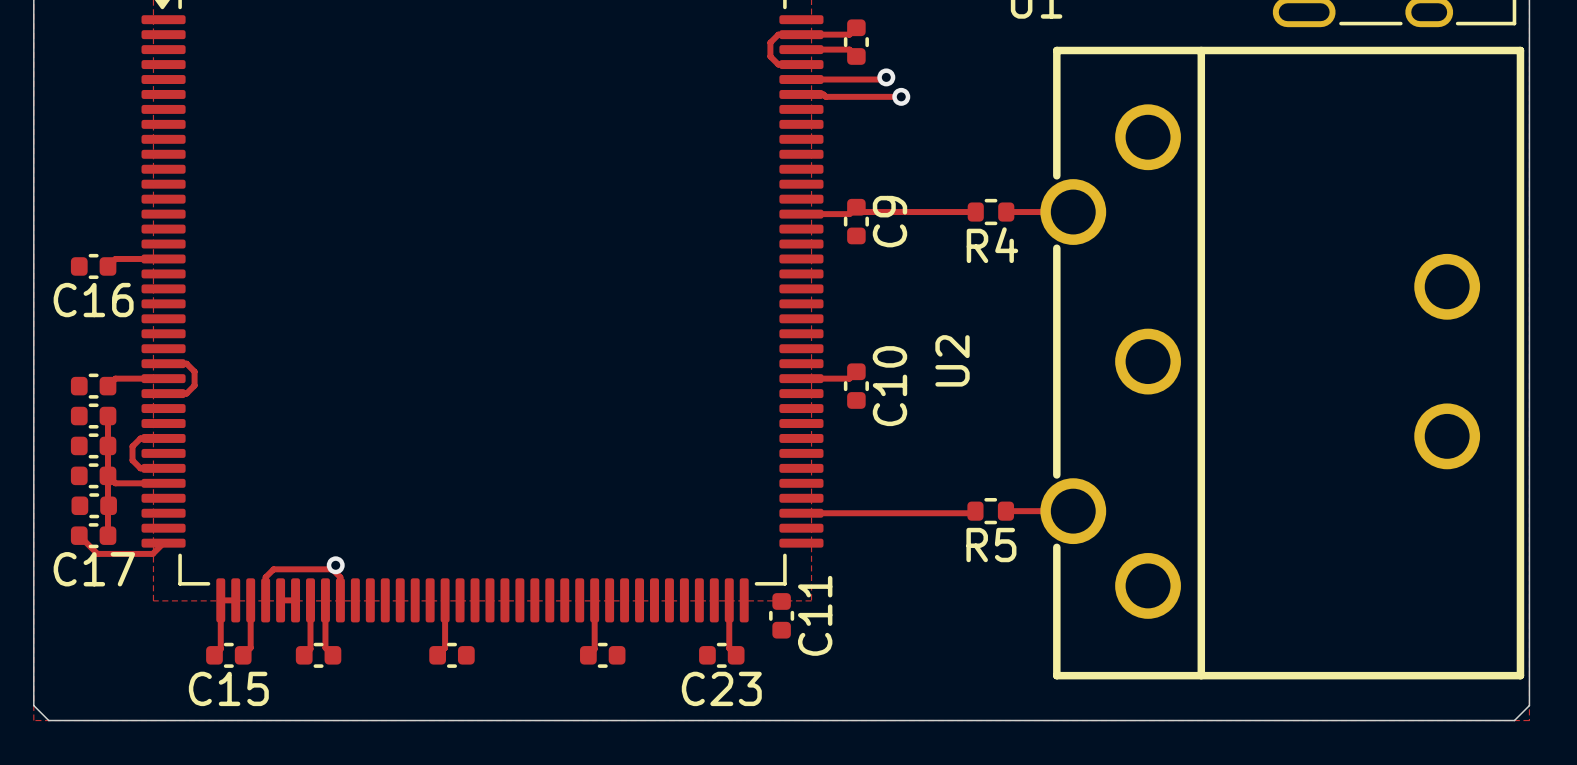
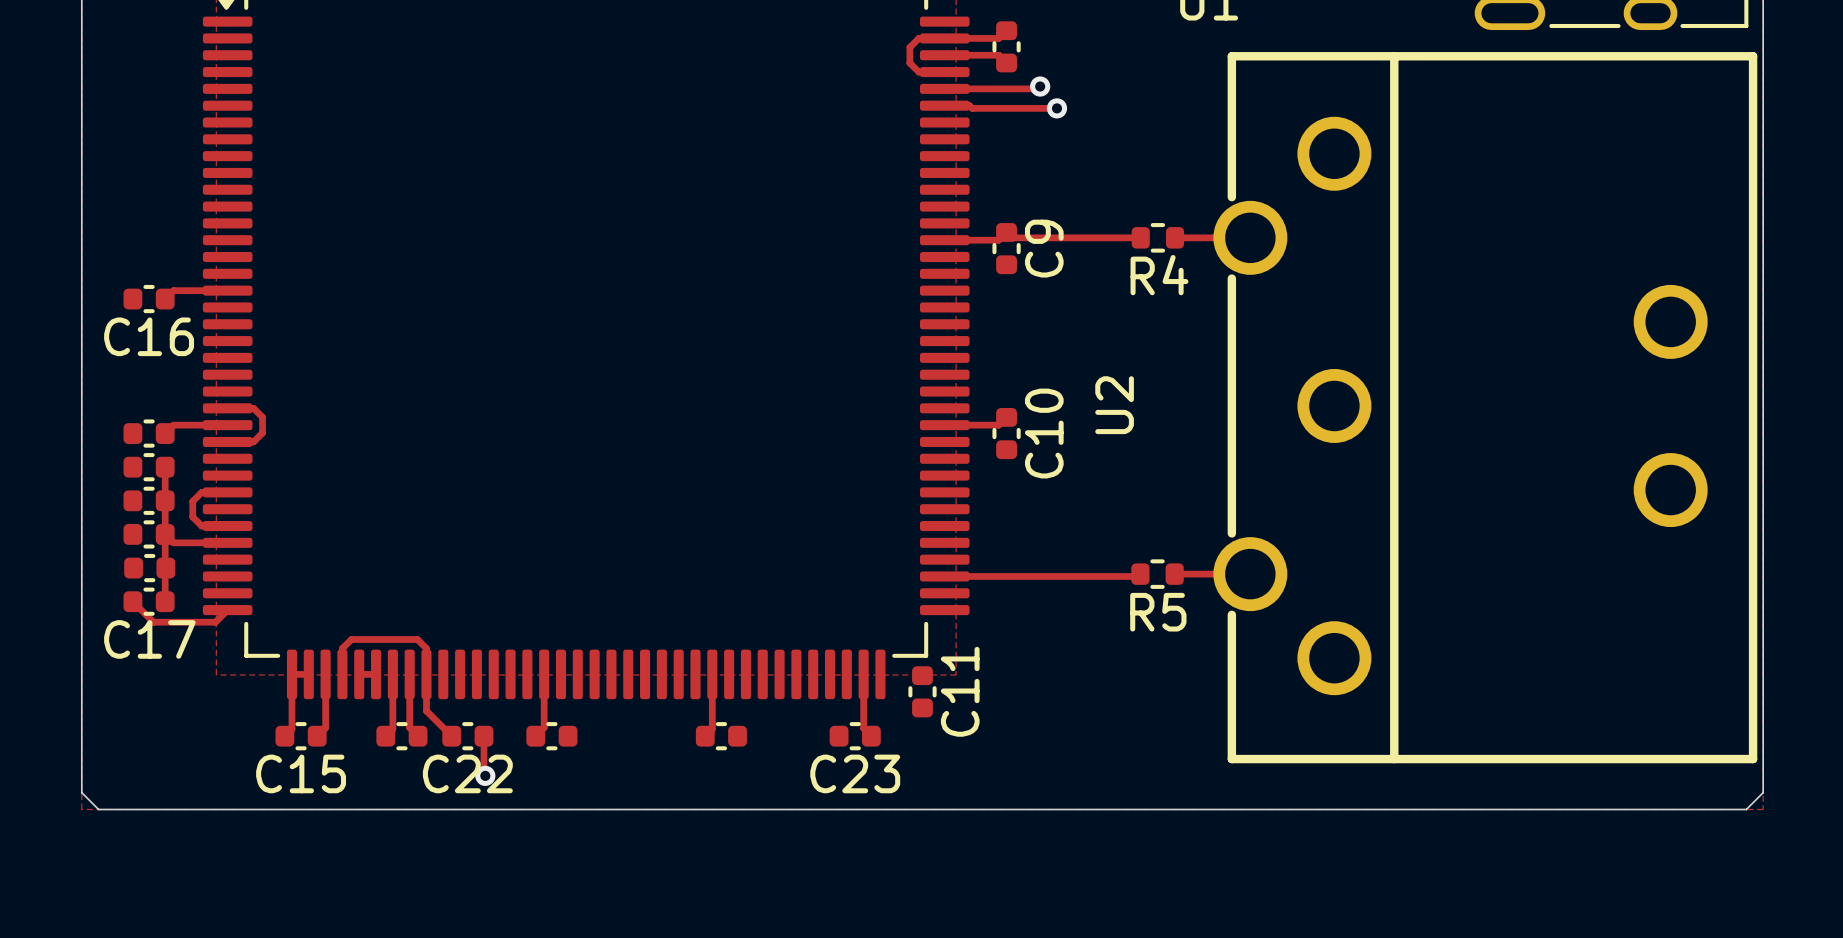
via position: (335, 565) -> (485, 775)
track: none -> (426, 674) (426, 710) (451, 736)
C22: none -> (467, 736)
track: none -> (483, 736) (485, 775)

